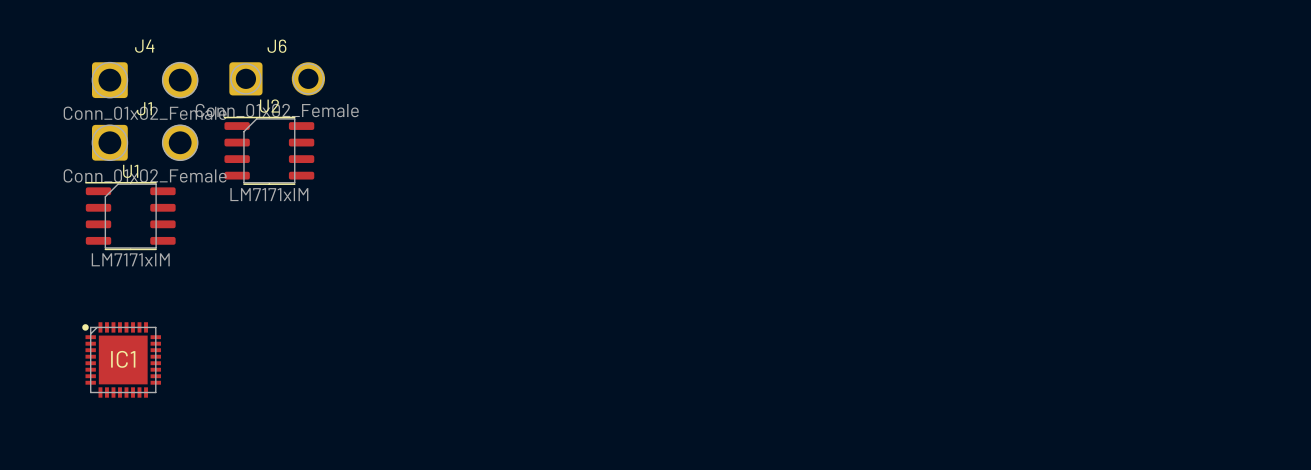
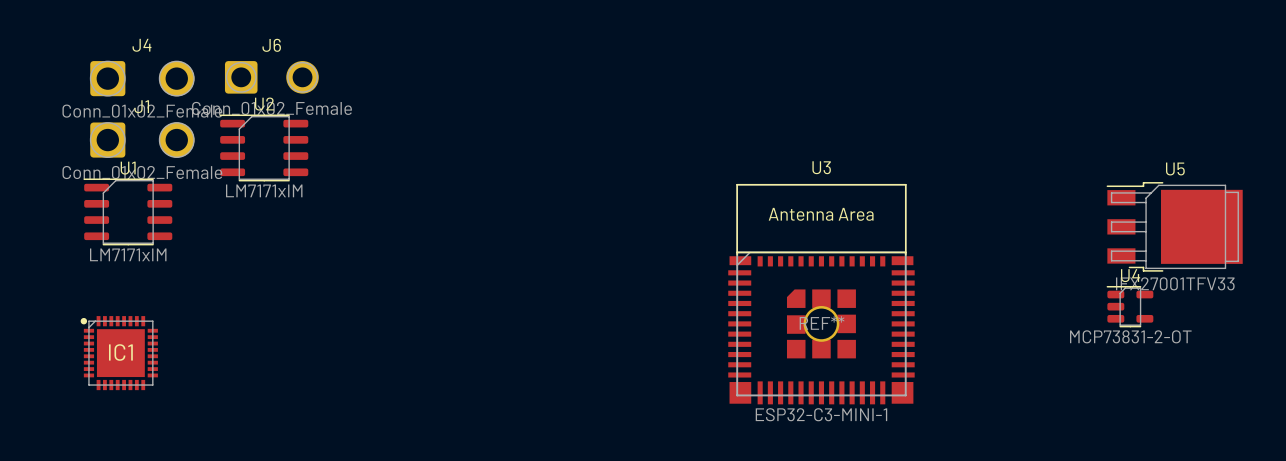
U5: none -> IFX27001TFV33 (1174, 226)
U3: none -> ESP32-C3-MINI-1 (821, 294)
U4: none -> MCP73831-2-OT (1129, 306)

